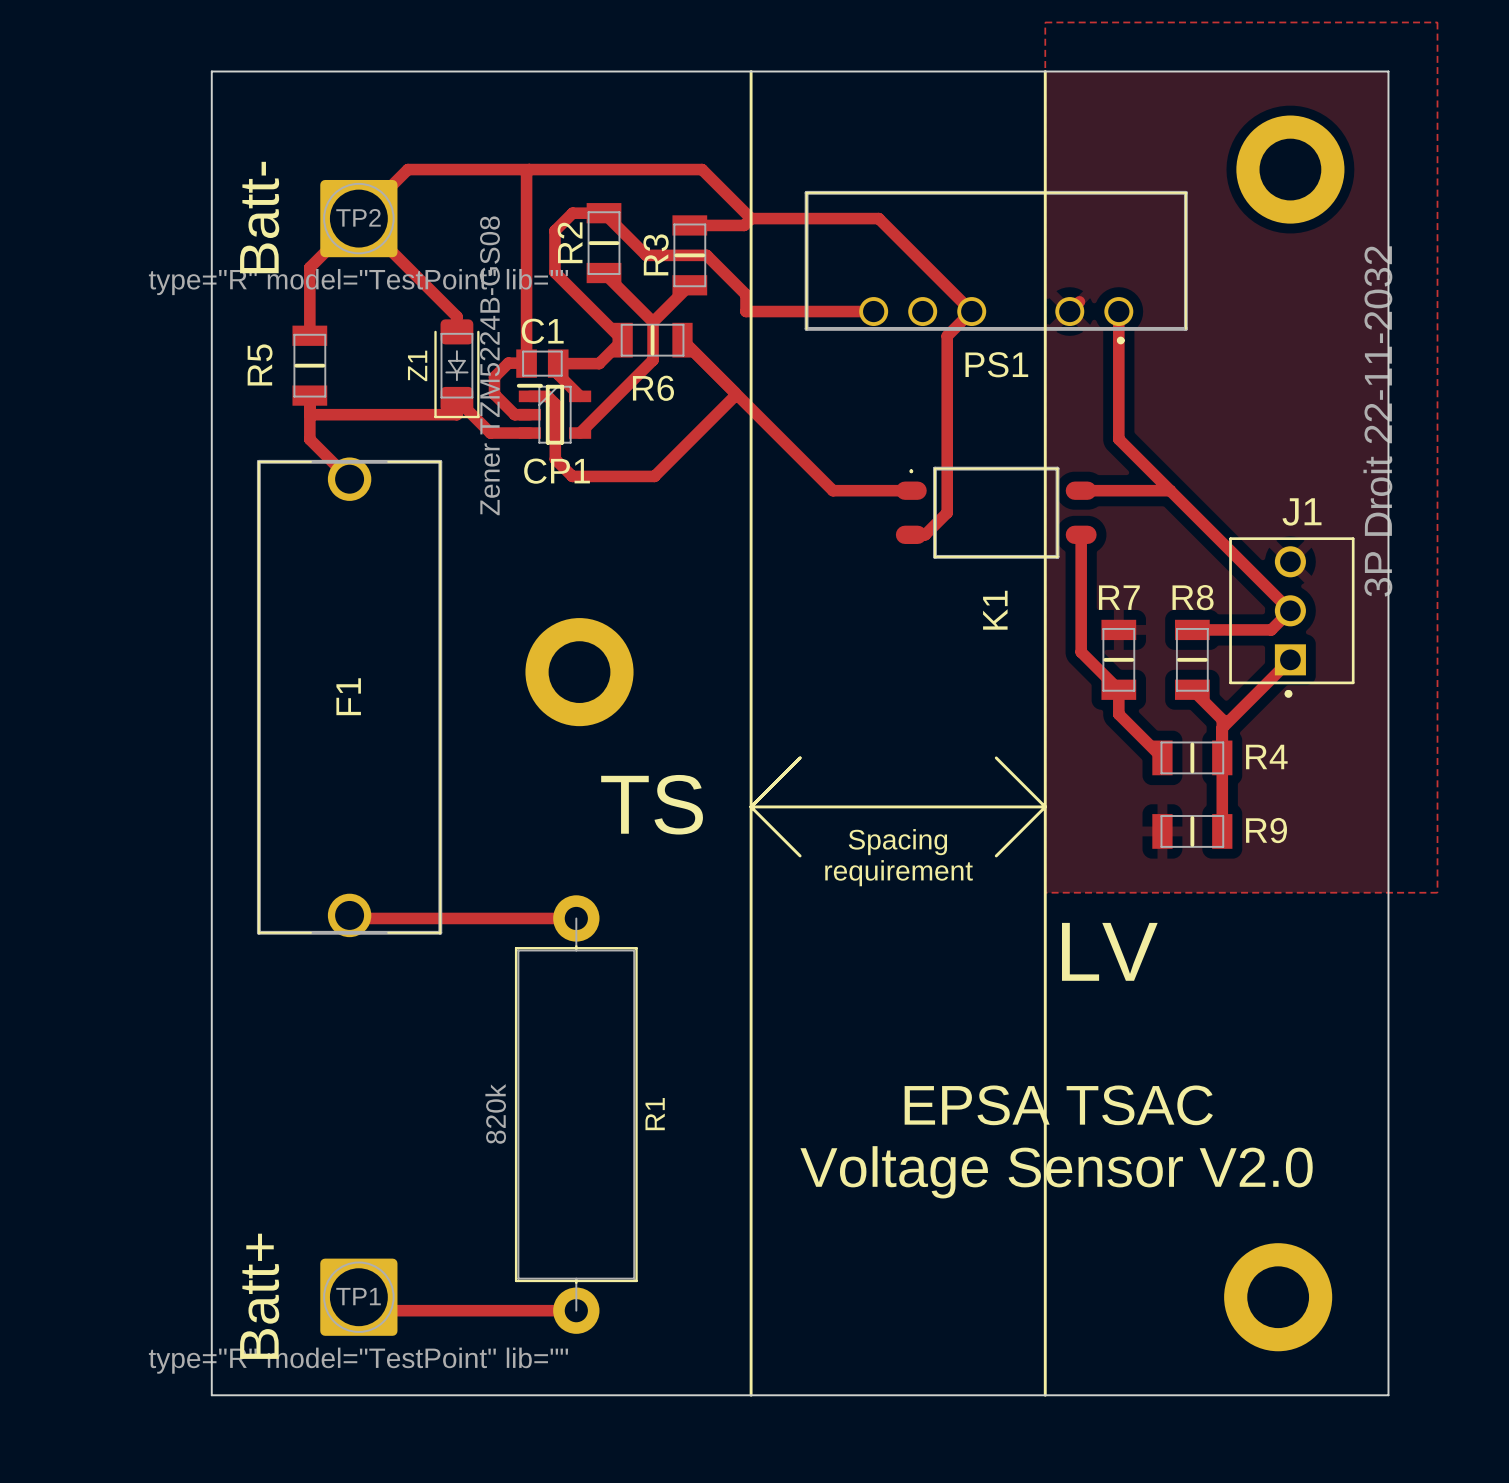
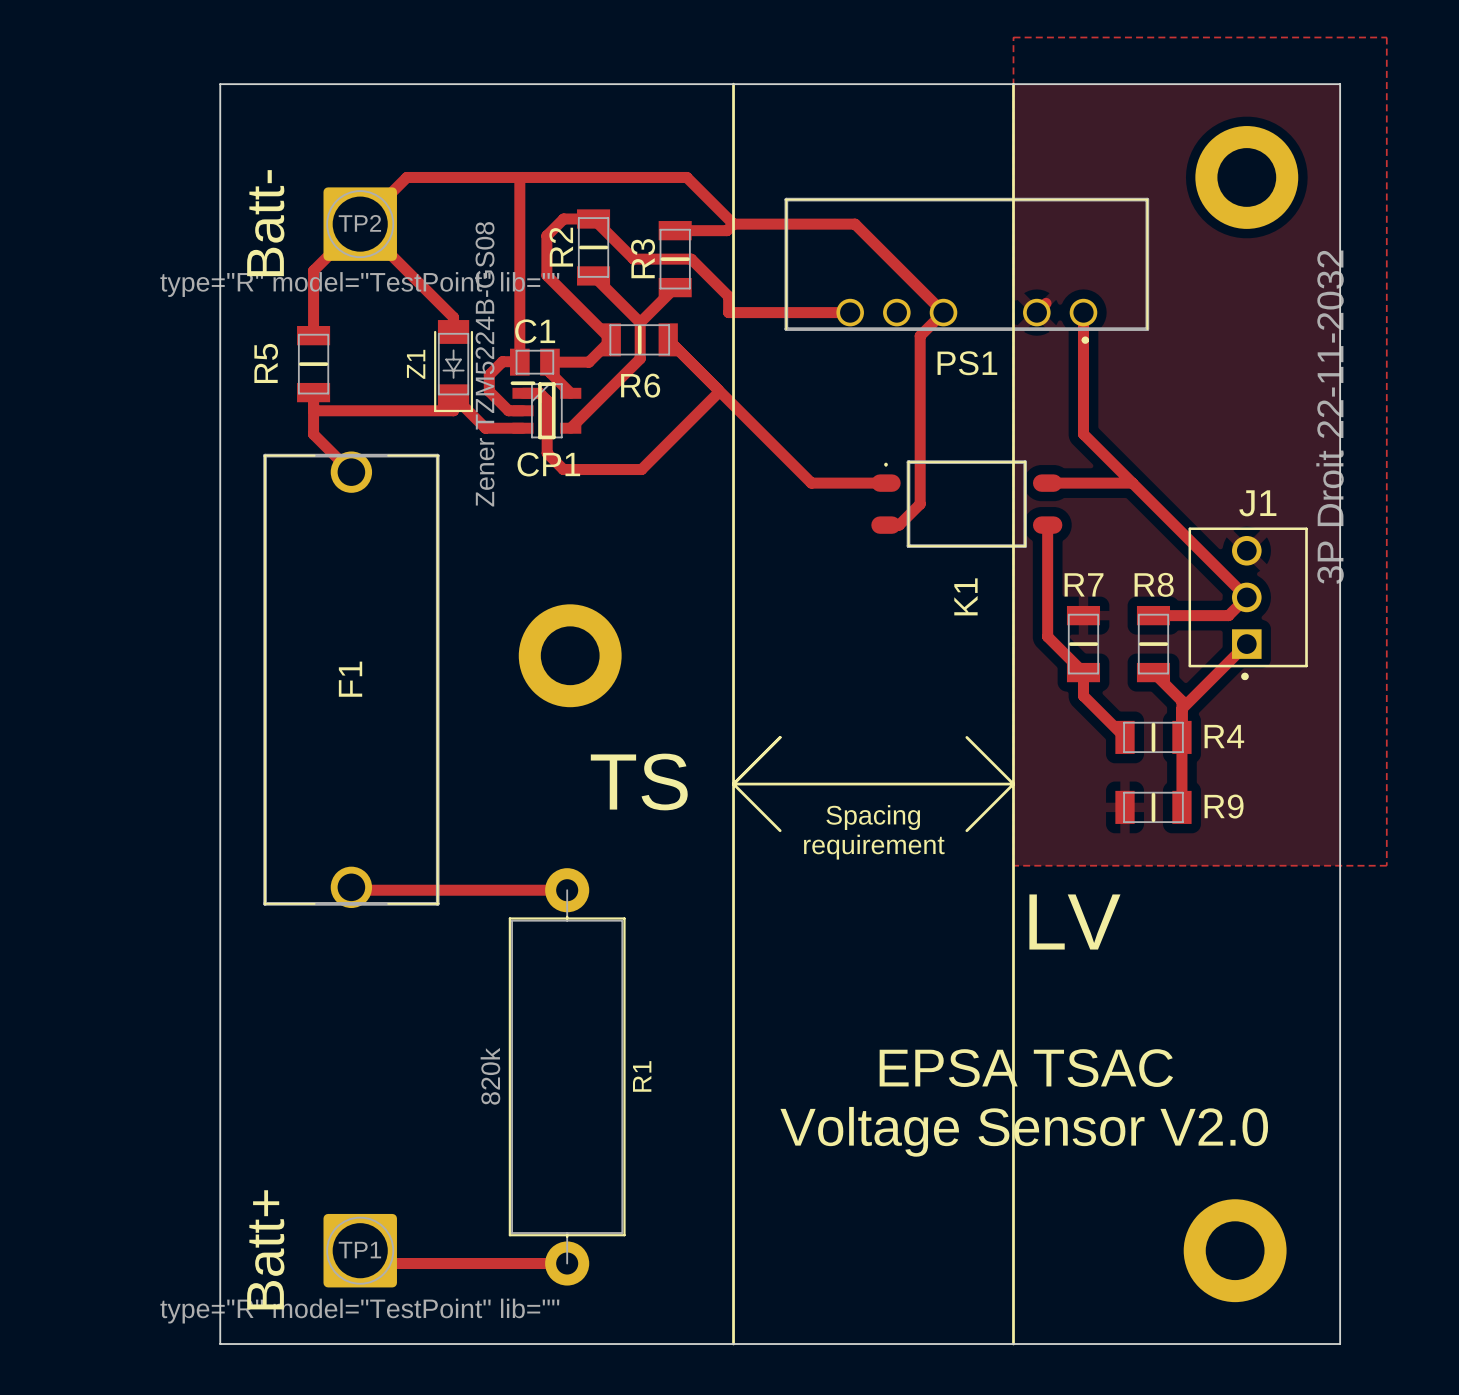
Z1 footprint: [434, 319, 480, 419] -> [434, 320, 474, 413]

